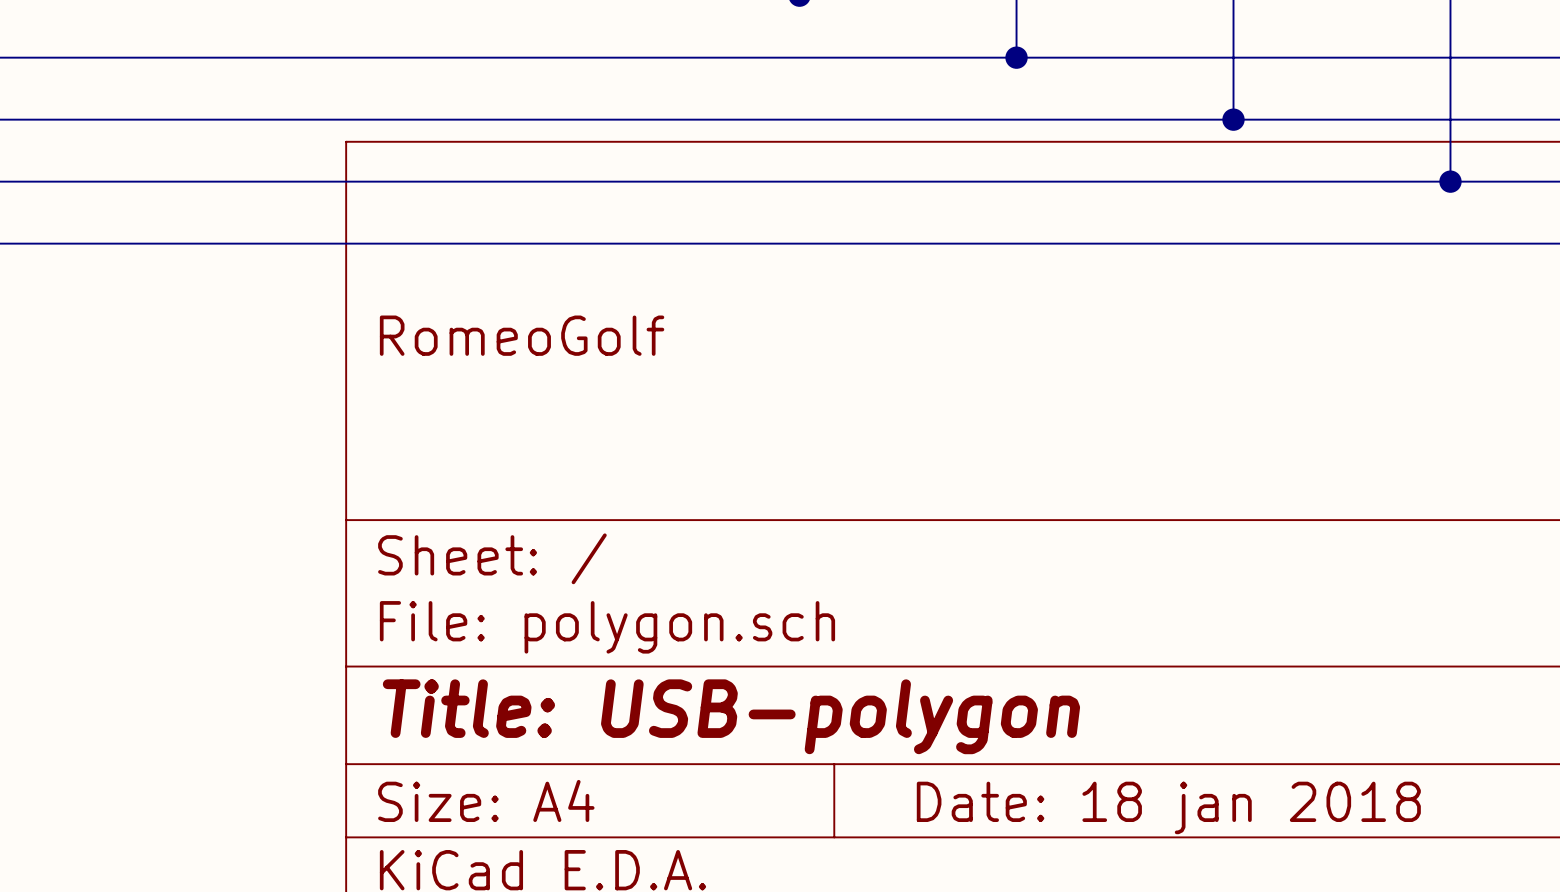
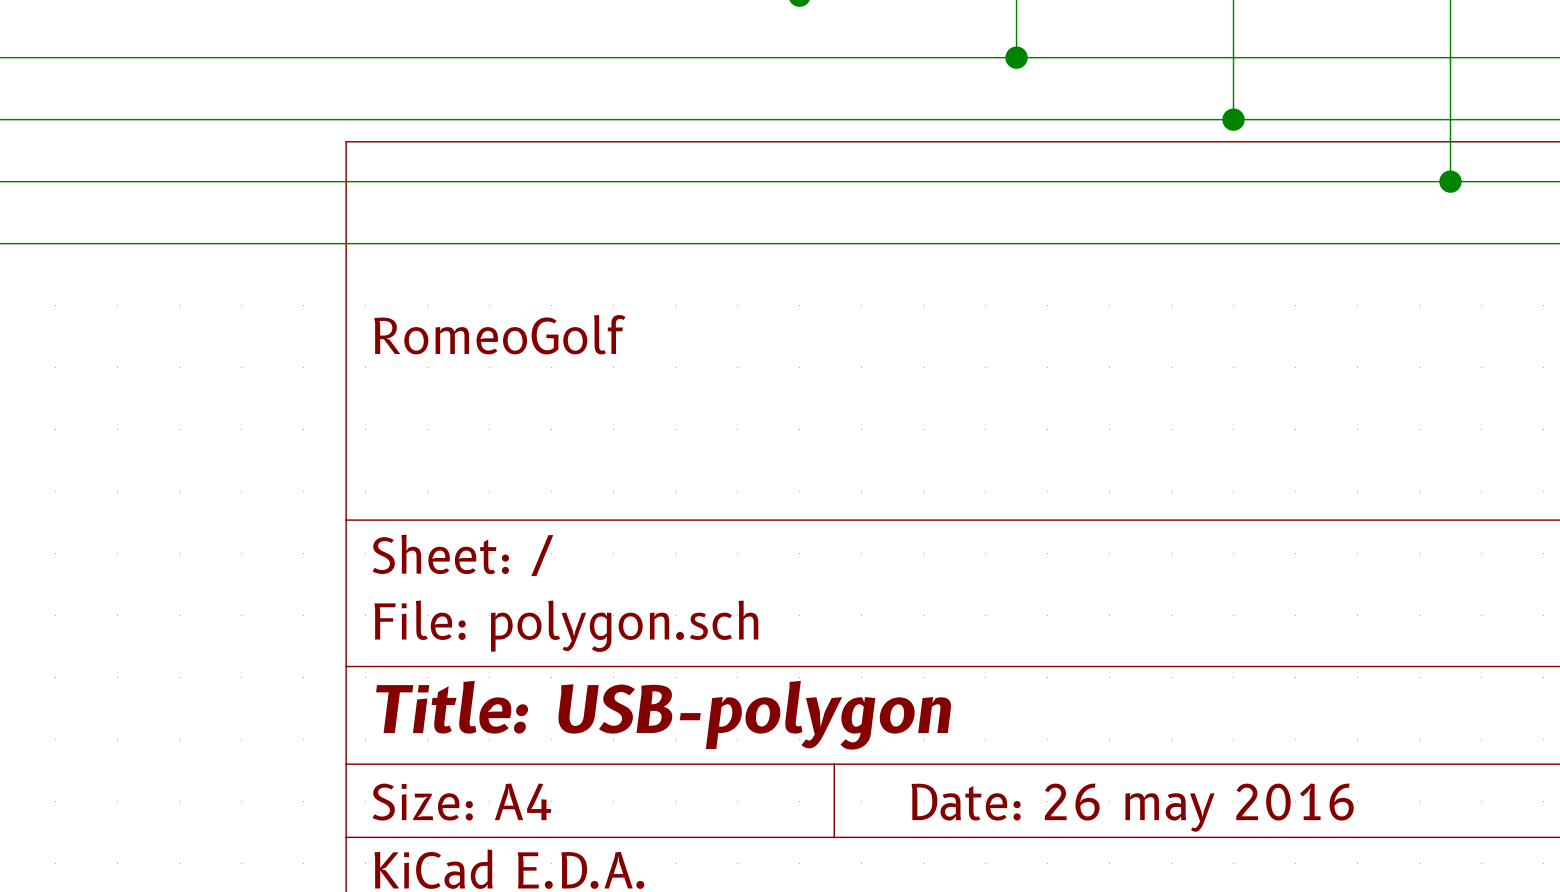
title block: Date: 18 jan 2018 (1168, 807) -> Date: 26 may 2016 (1132, 807)

